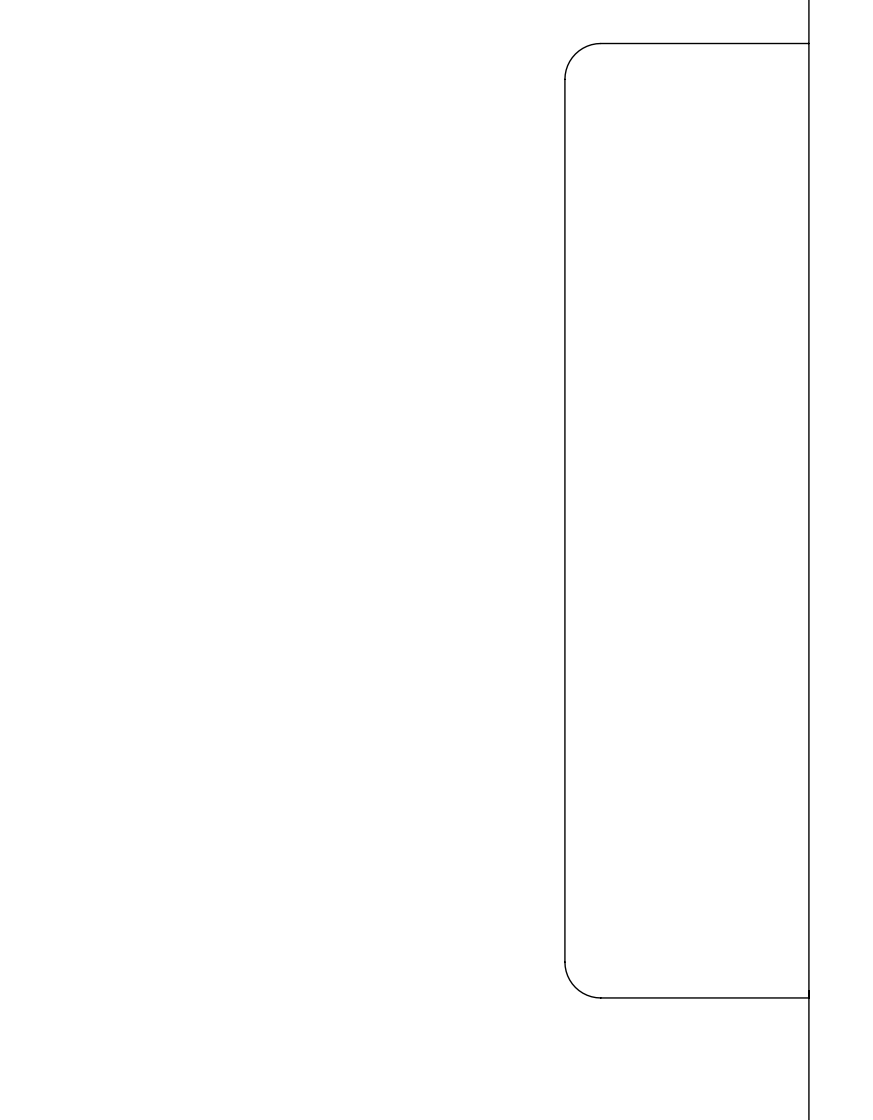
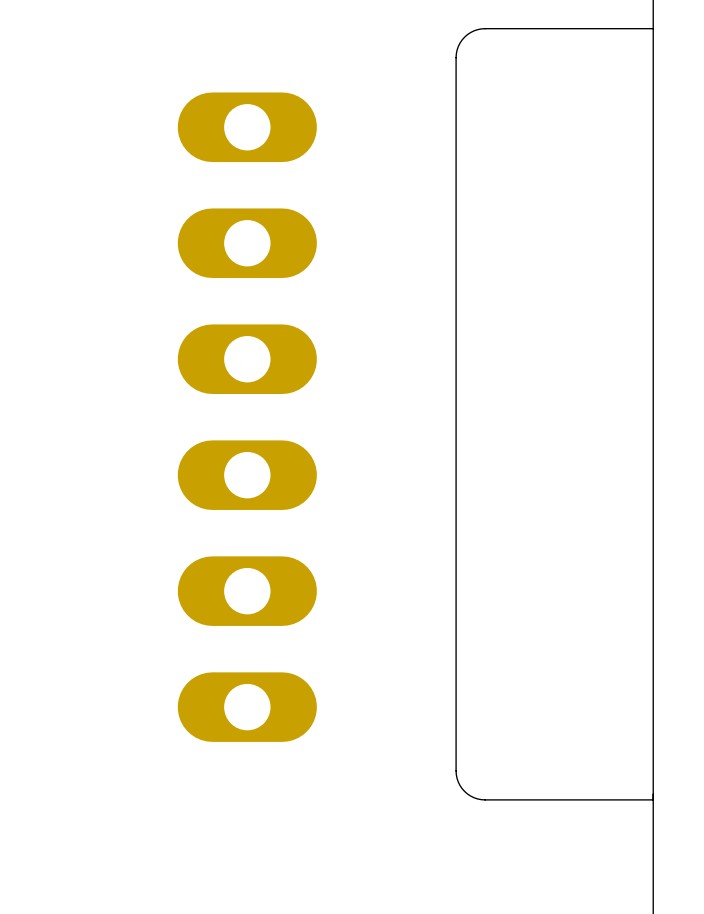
part: none -> (247, 417)

